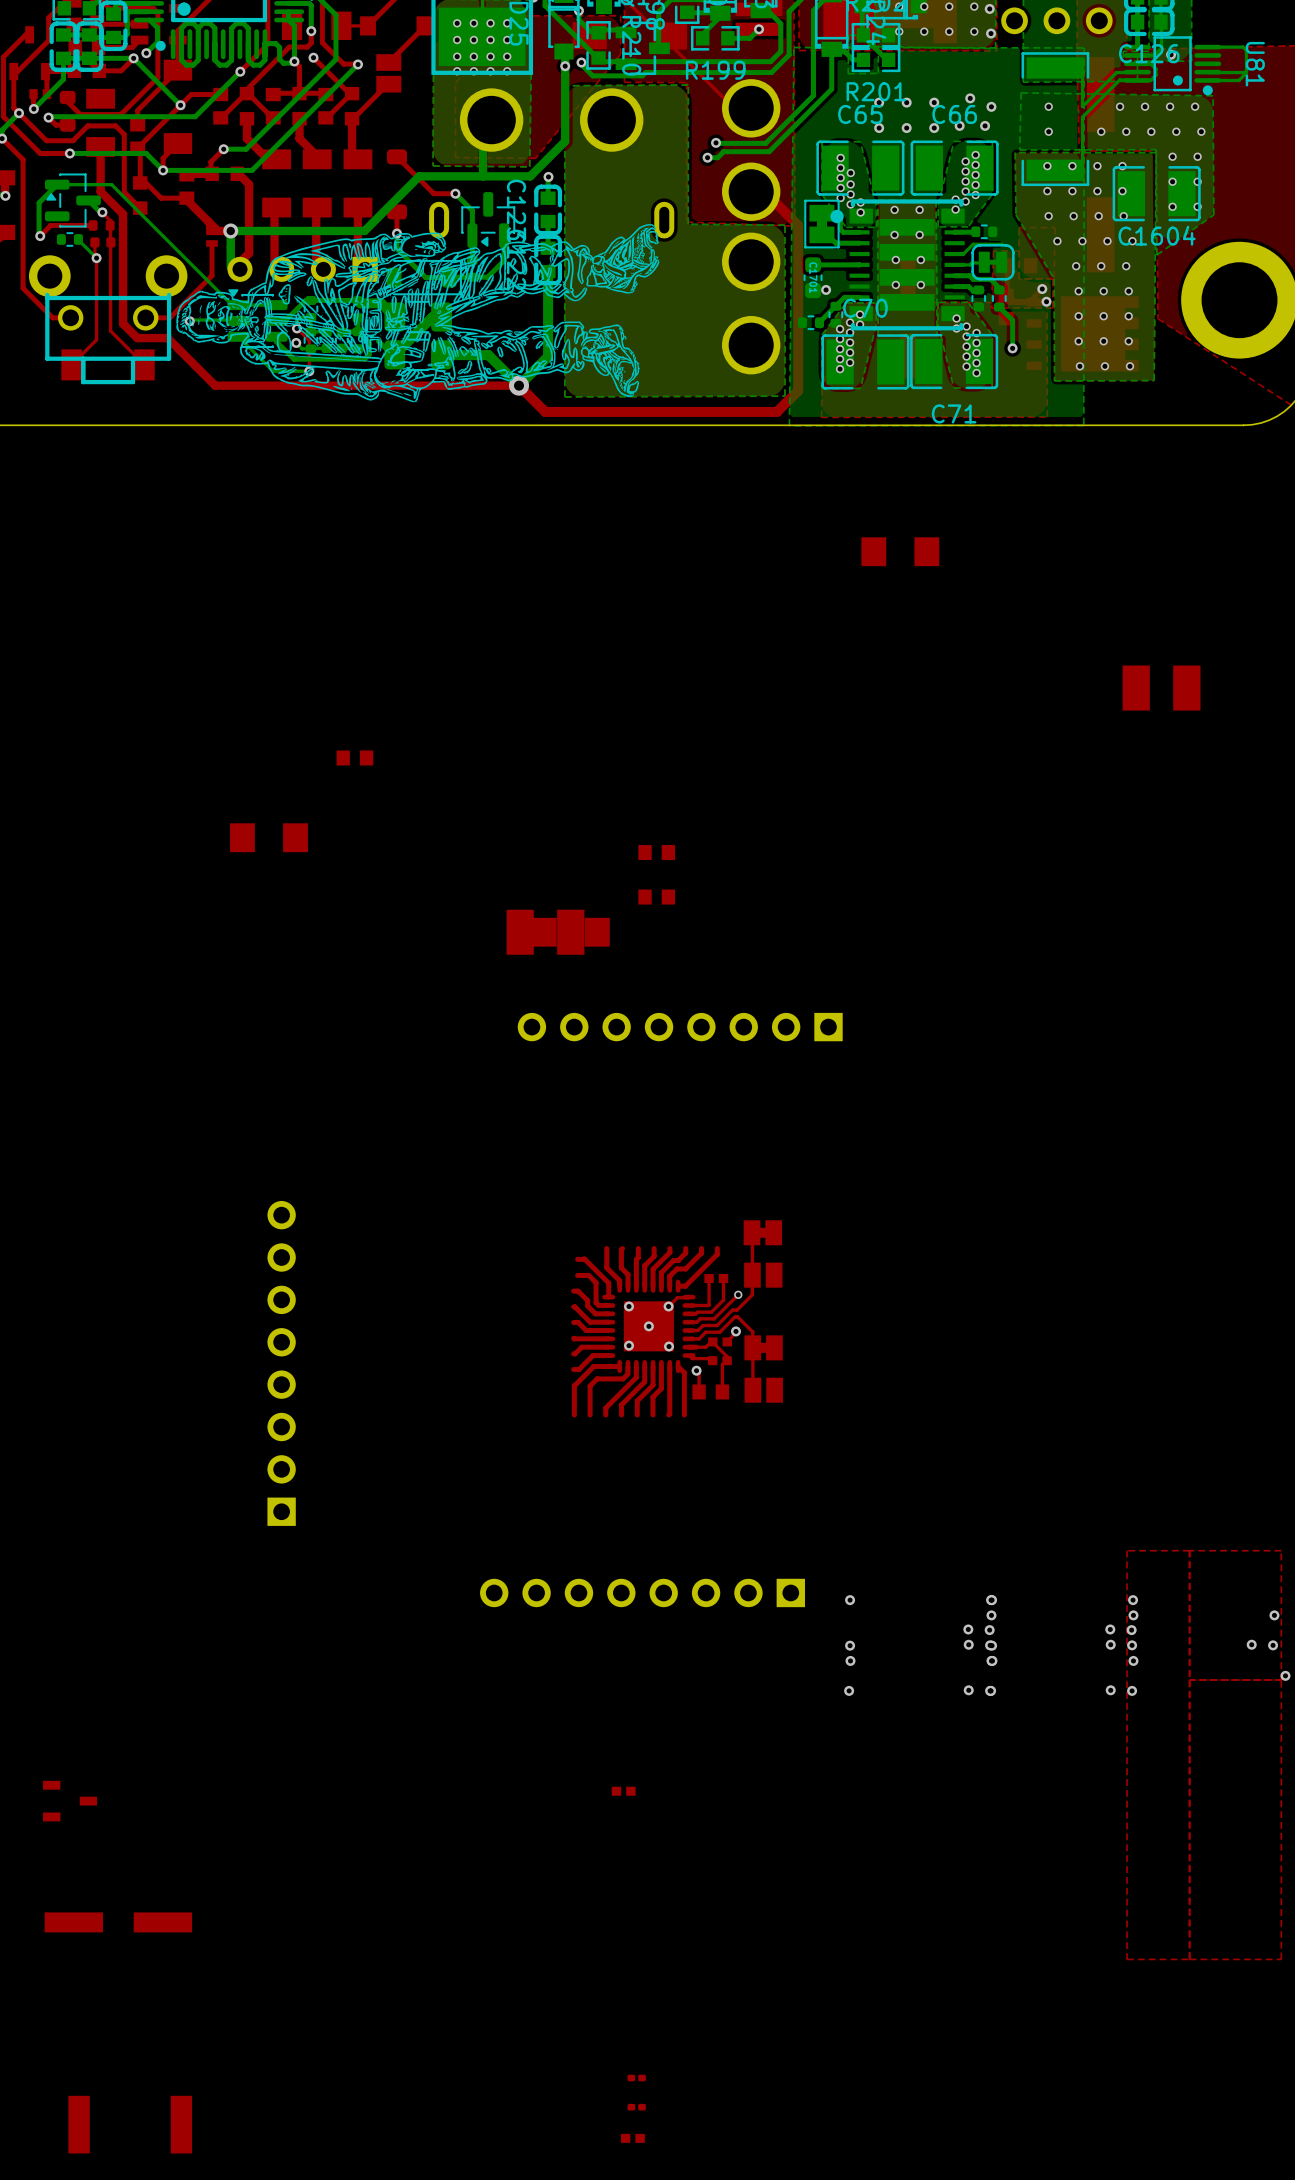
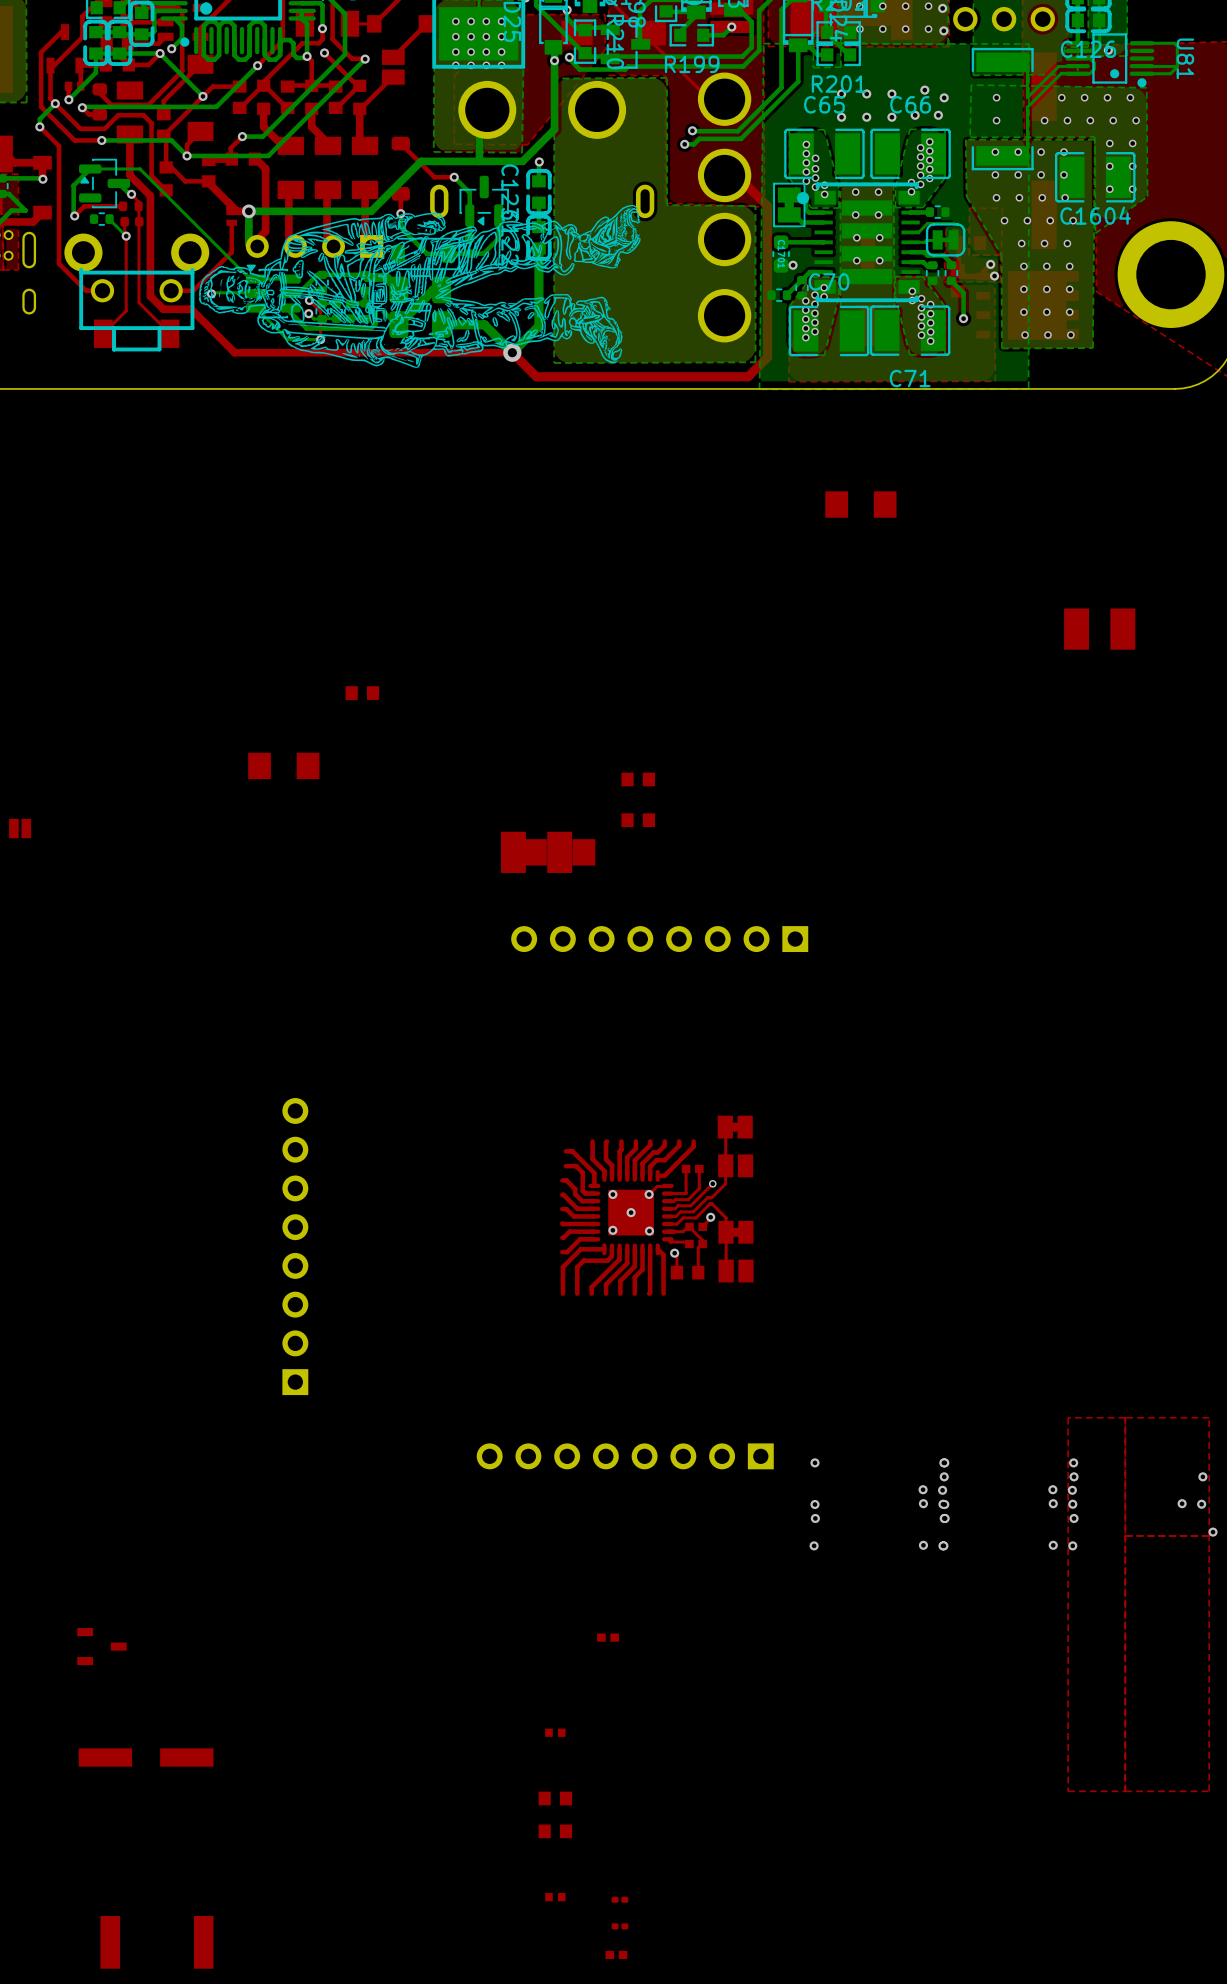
part: none -> (555, 1732)
part: none -> (555, 1798)
part: none -> (555, 1831)
part: none -> (555, 1897)

